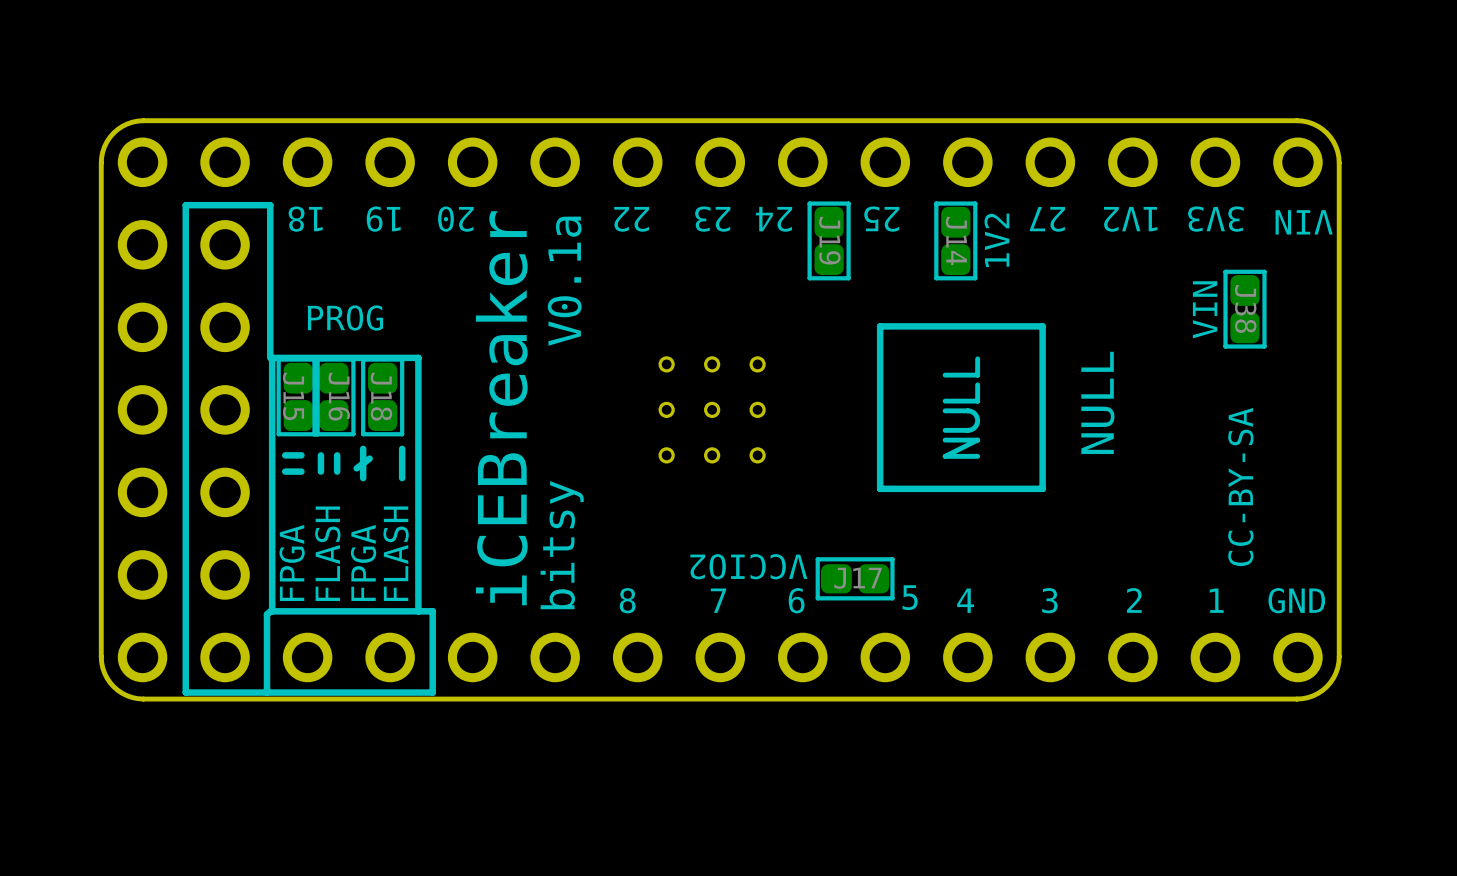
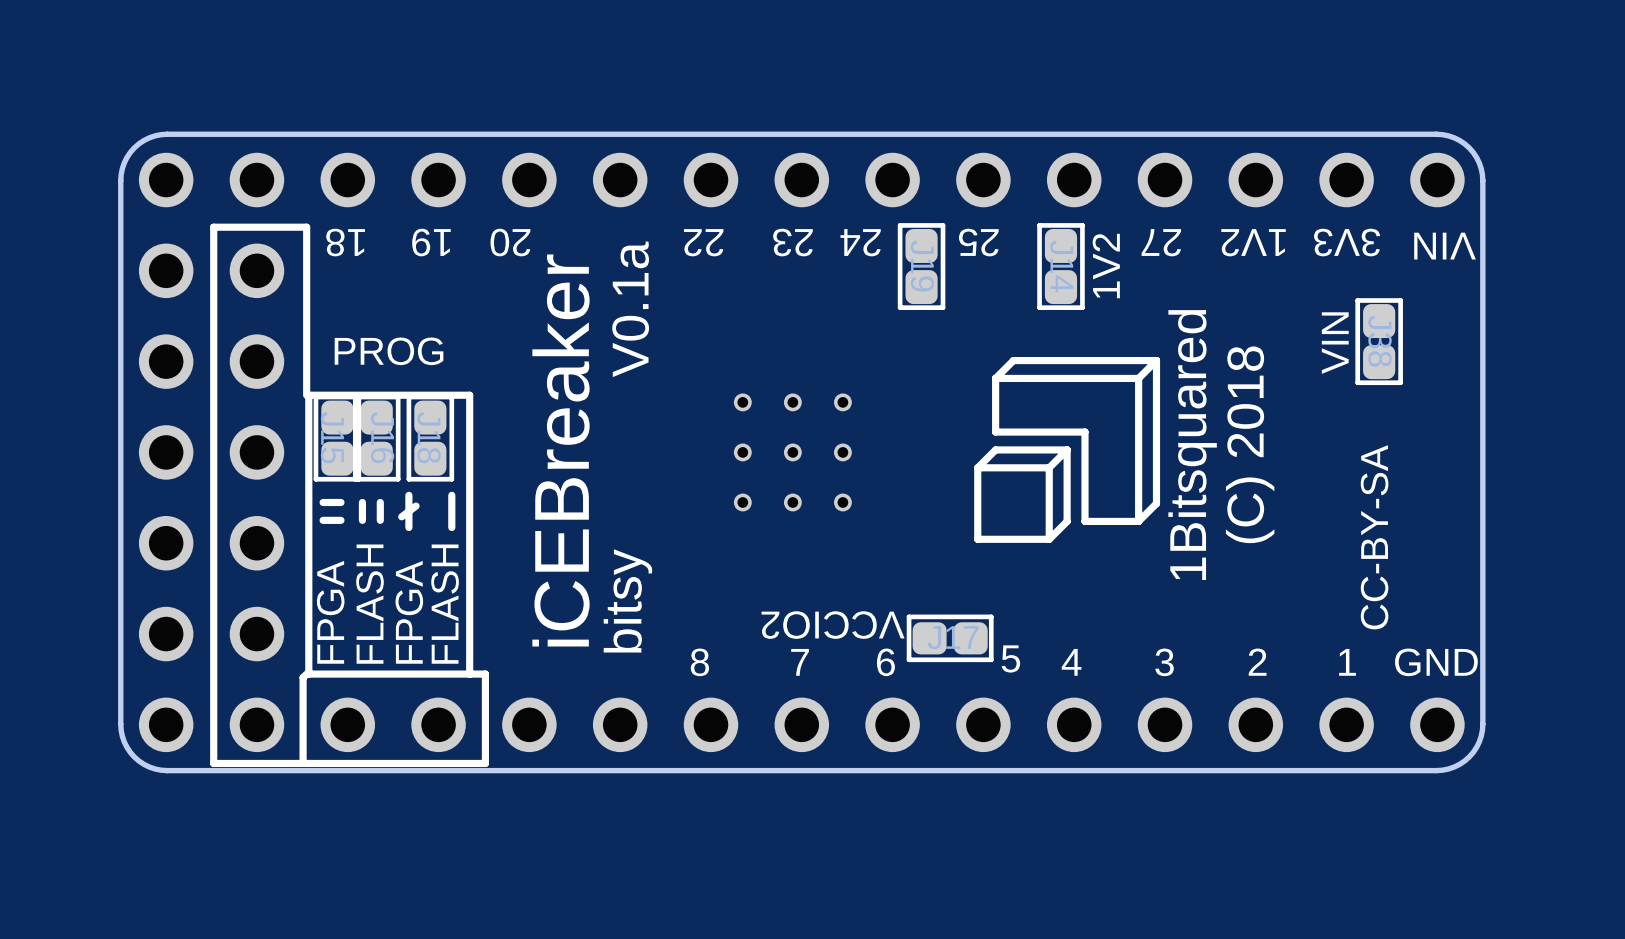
drawing shape: [876, 323, 1046, 493] -> [974, 356, 1161, 543]
text: none -> (C) 2018 (1250, 444)
text: none -> 1Bitsquared (1192, 444)
text: NULL (1097, 402) -> none

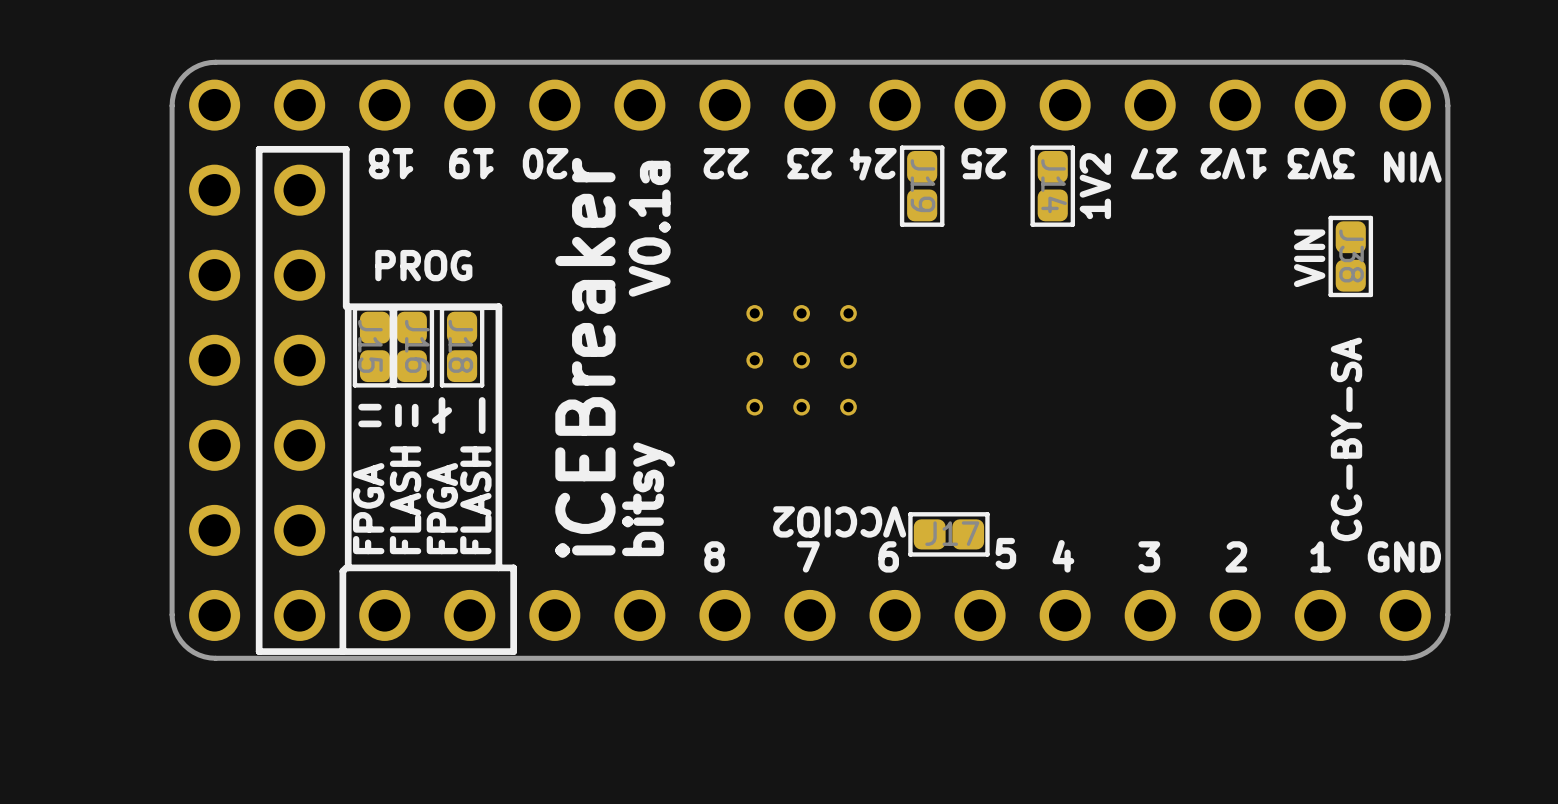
drawing: [974, 356, 1161, 543] -> none
text: 1Bitsquared (1192, 444) -> none
text: (C) 2018 (1250, 444) -> none

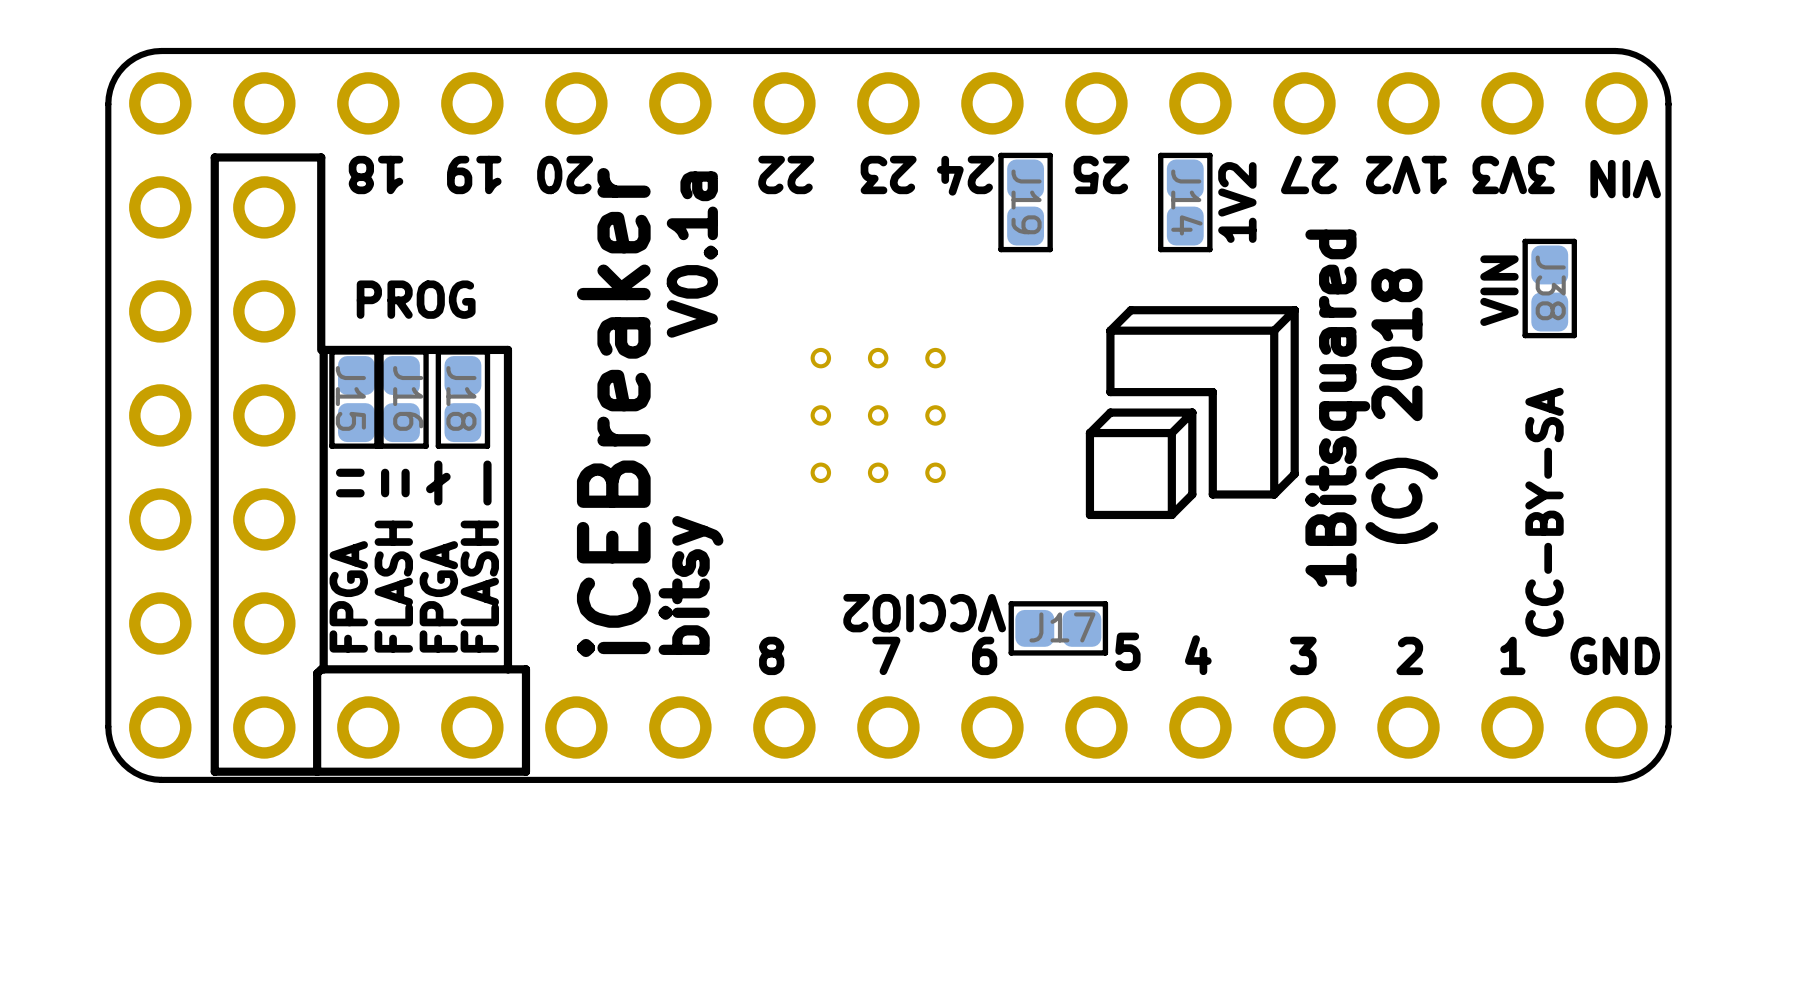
drawing: none -> [1085, 306, 1299, 520]
text: none -> (C) 2018 (1401, 406)
text: none -> 1Bitsquared (1337, 408)

